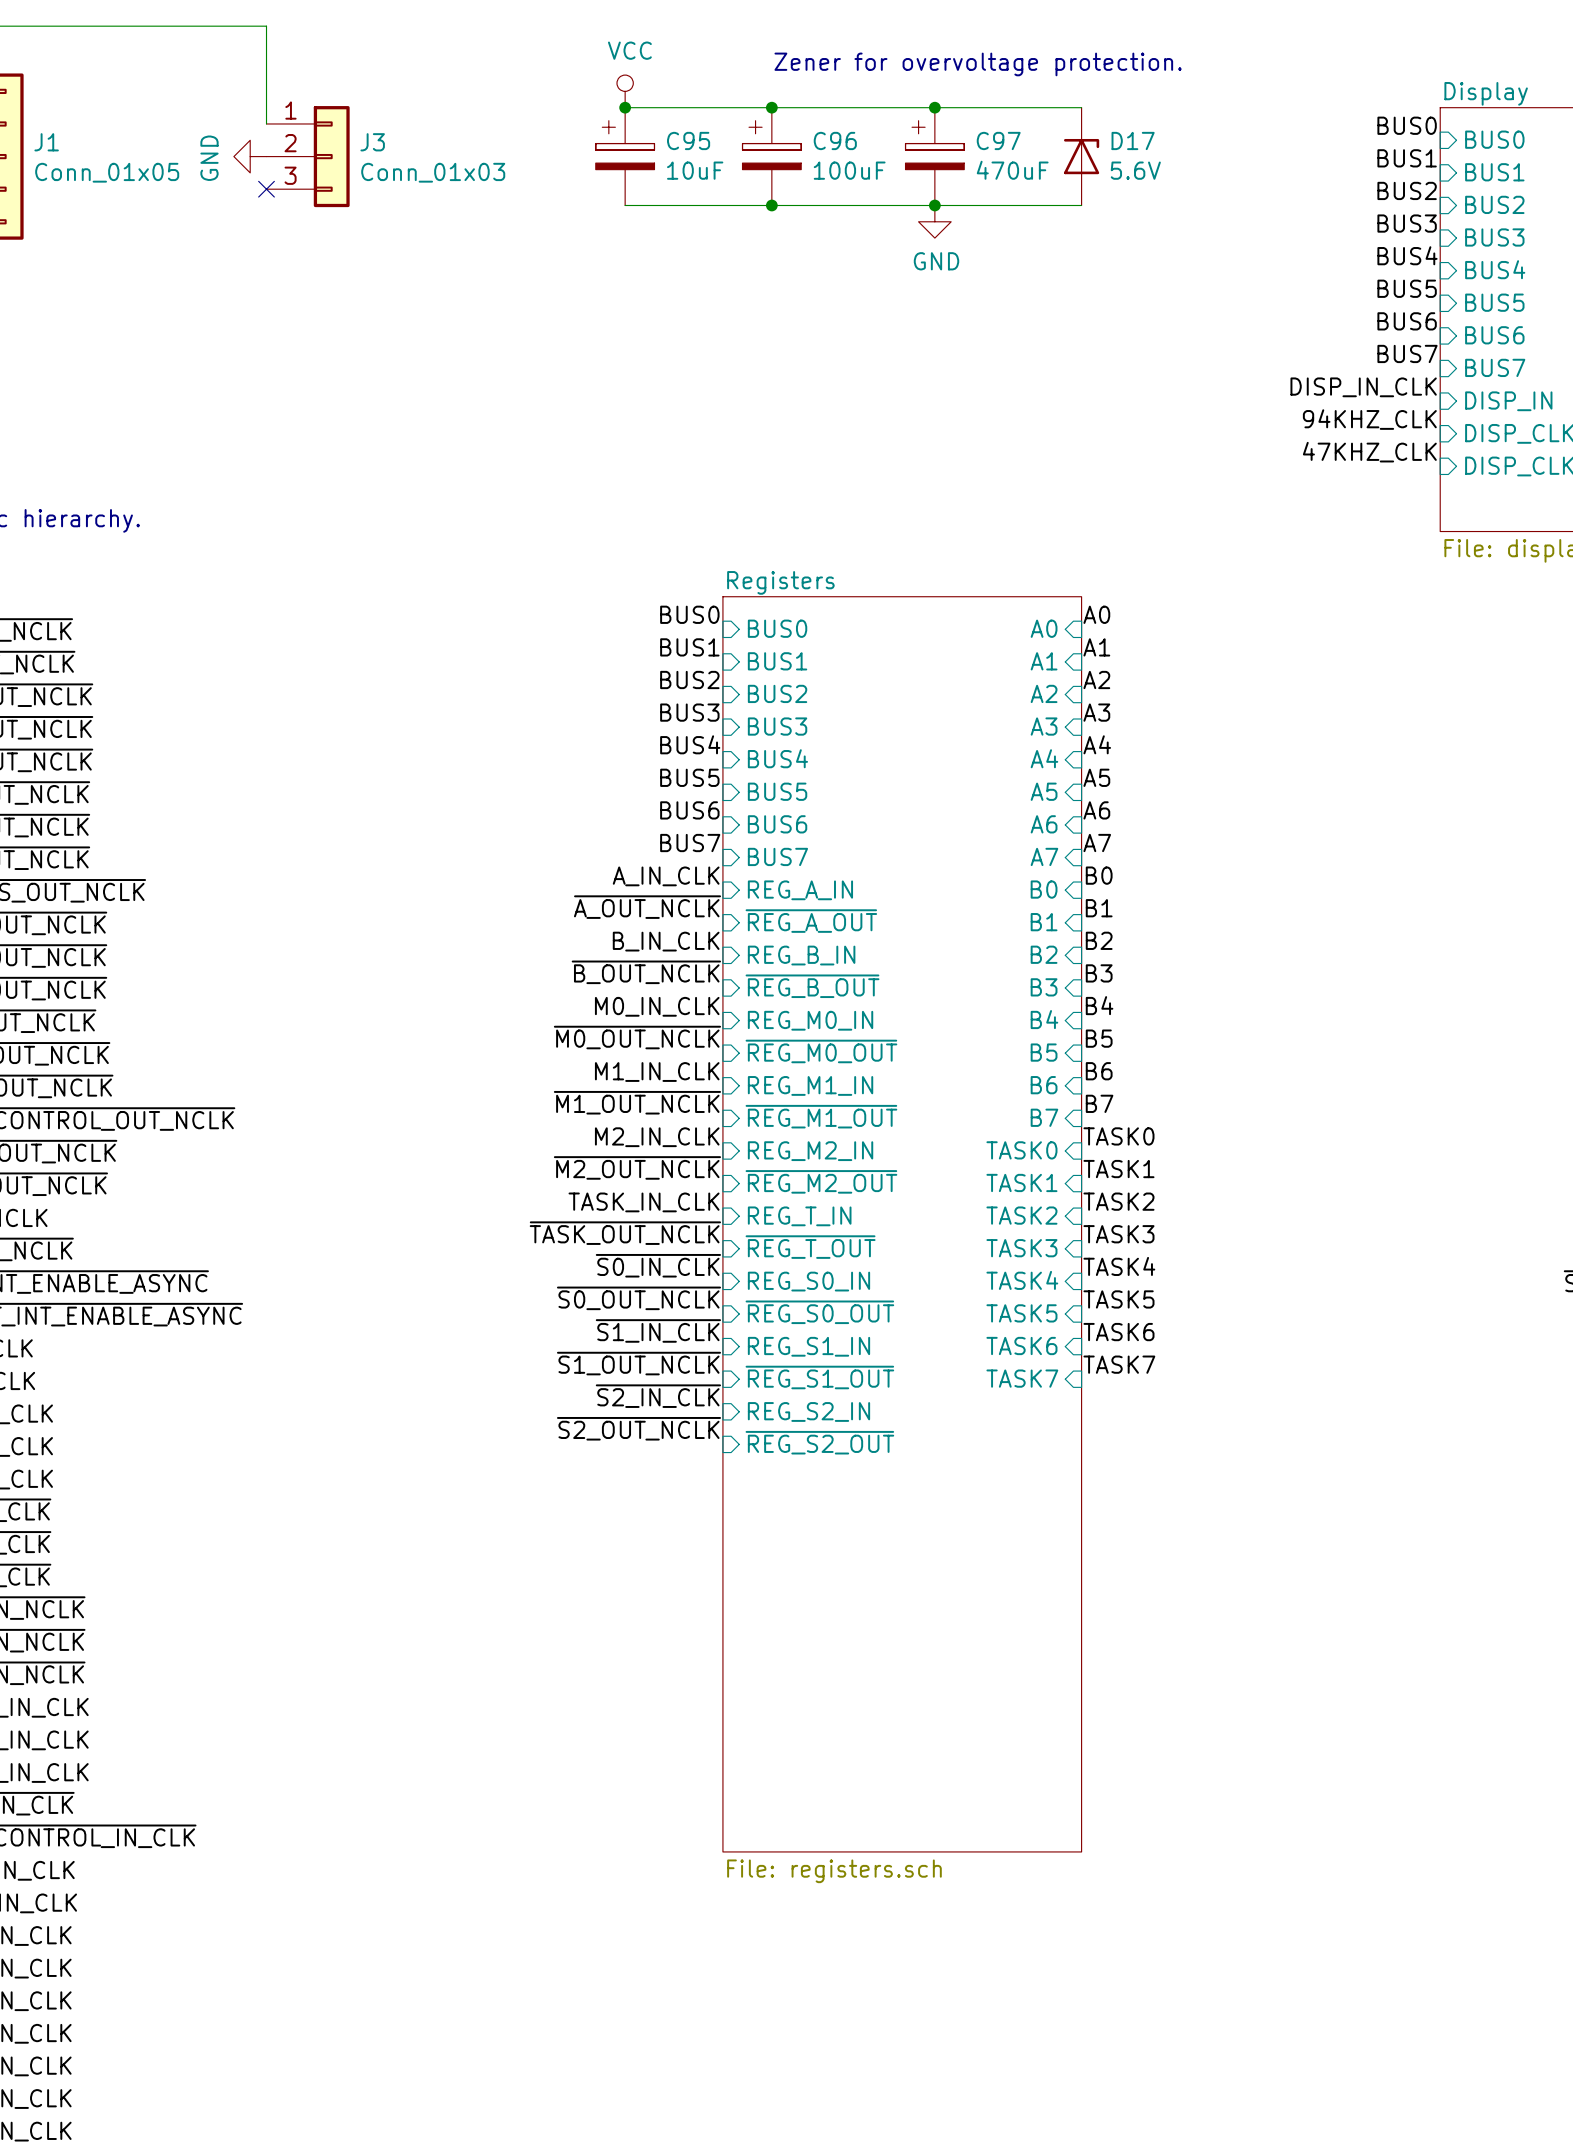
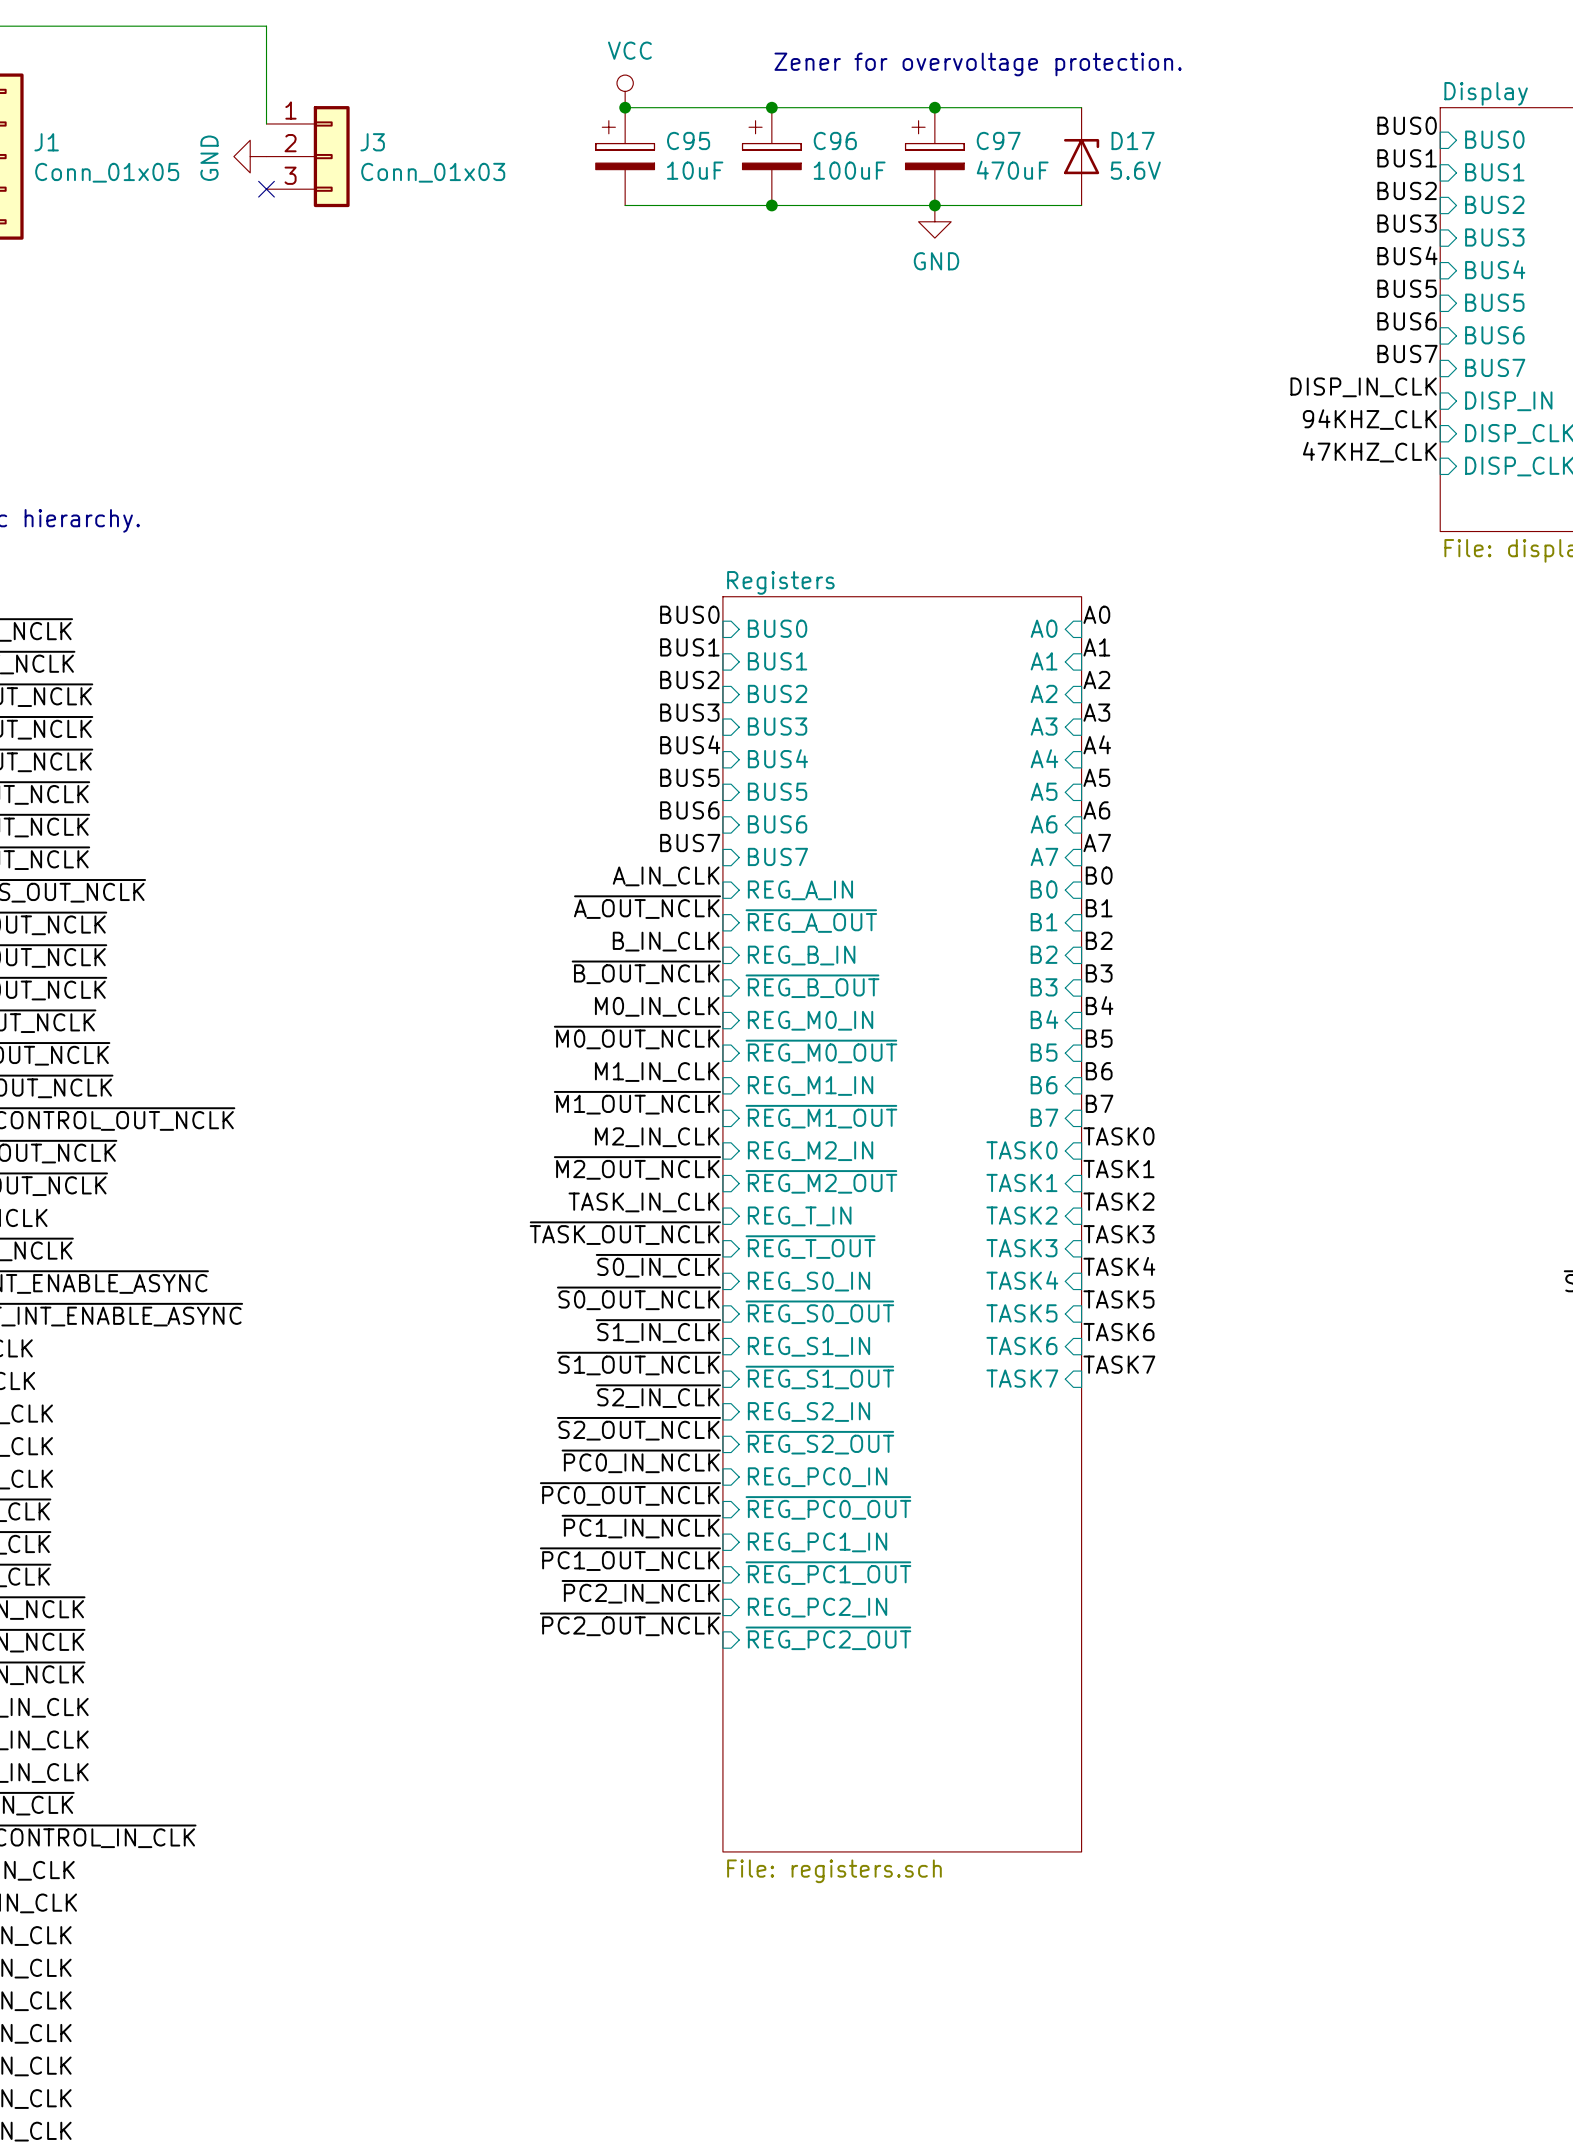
label: none -> ~{PC0_IN_NCLK} (641, 1461)
sheet pin: none -> REG_PC0_IN (817, 1477)
label: none -> ~{PC0_OUT_NCLK} (630, 1493)
sheet pin: none -> ~{REG_PC0_OUT} (828, 1507)
label: none -> ~{PC1_IN_NCLK} (641, 1526)
sheet pin: none -> REG_PC1_IN (817, 1542)
label: none -> ~{PC1_OUT_NCLK} (630, 1559)
sheet pin: none -> ~{REG_PC1_OUT} (828, 1573)
label: none -> ~{PC2_IN_NCLK} (641, 1591)
sheet pin: none -> REG_PC2_IN (817, 1607)
label: none -> ~{PC2_OUT_NCLK} (630, 1624)
sheet pin: none -> ~{REG_PC2_OUT} (828, 1638)

